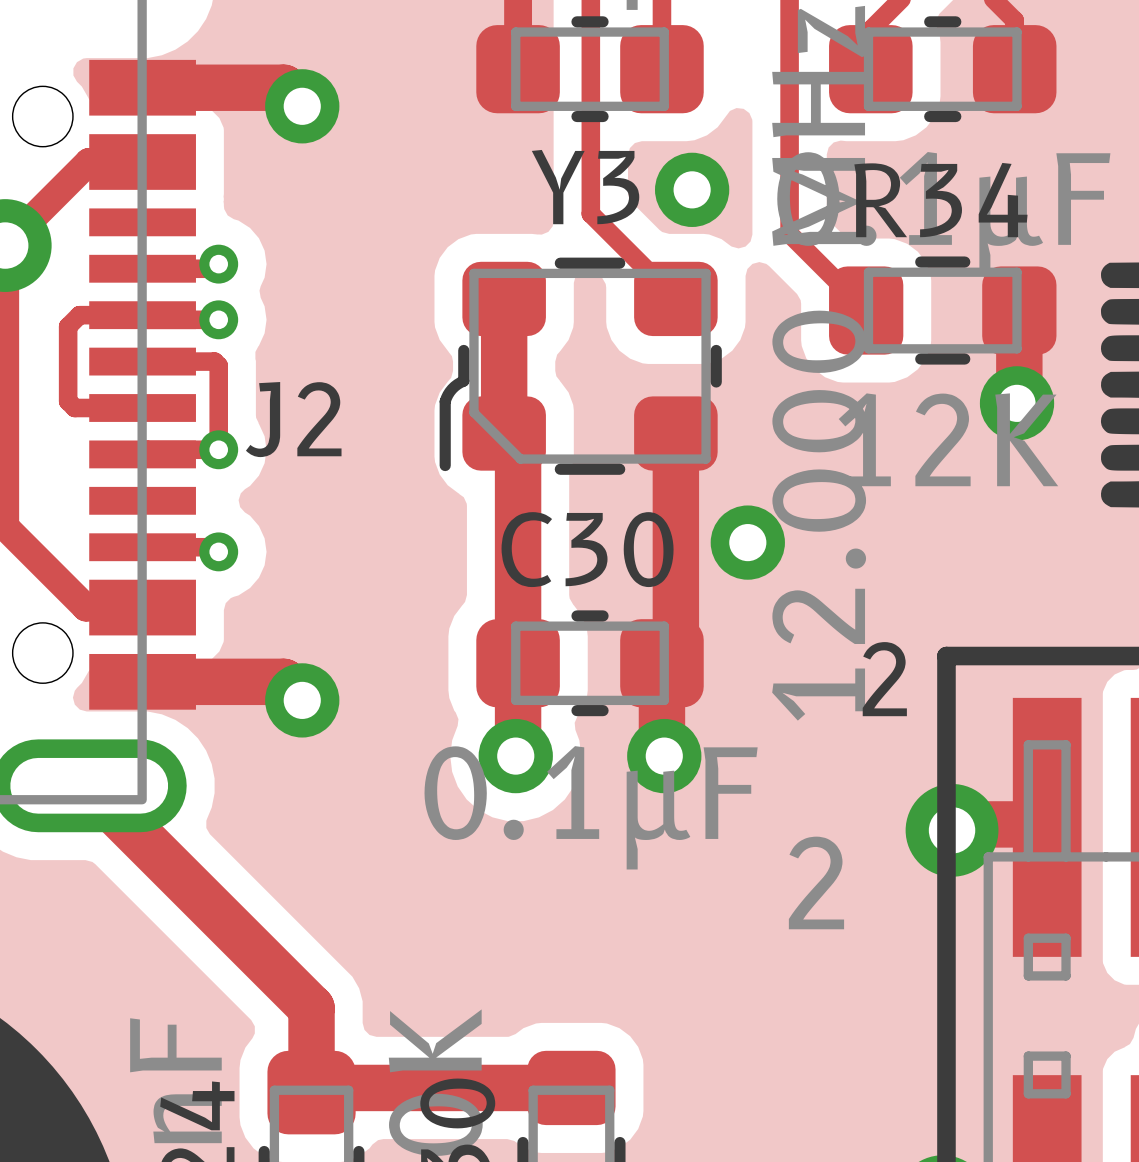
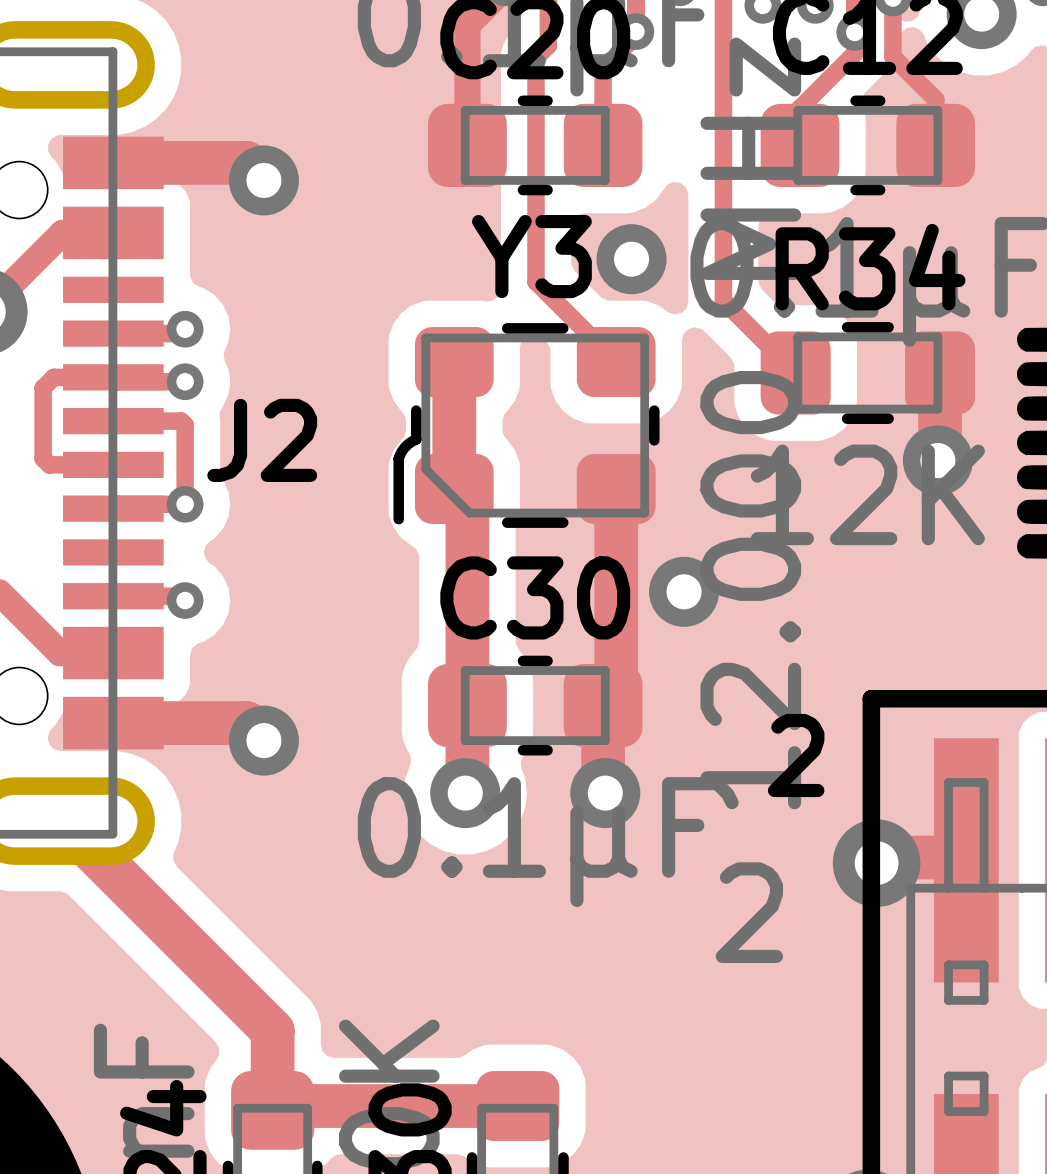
J2 name position: J2 (293, 419) -> J2 (262, 440)
part text position: 2 (884, 679) -> 2 (796, 755)

